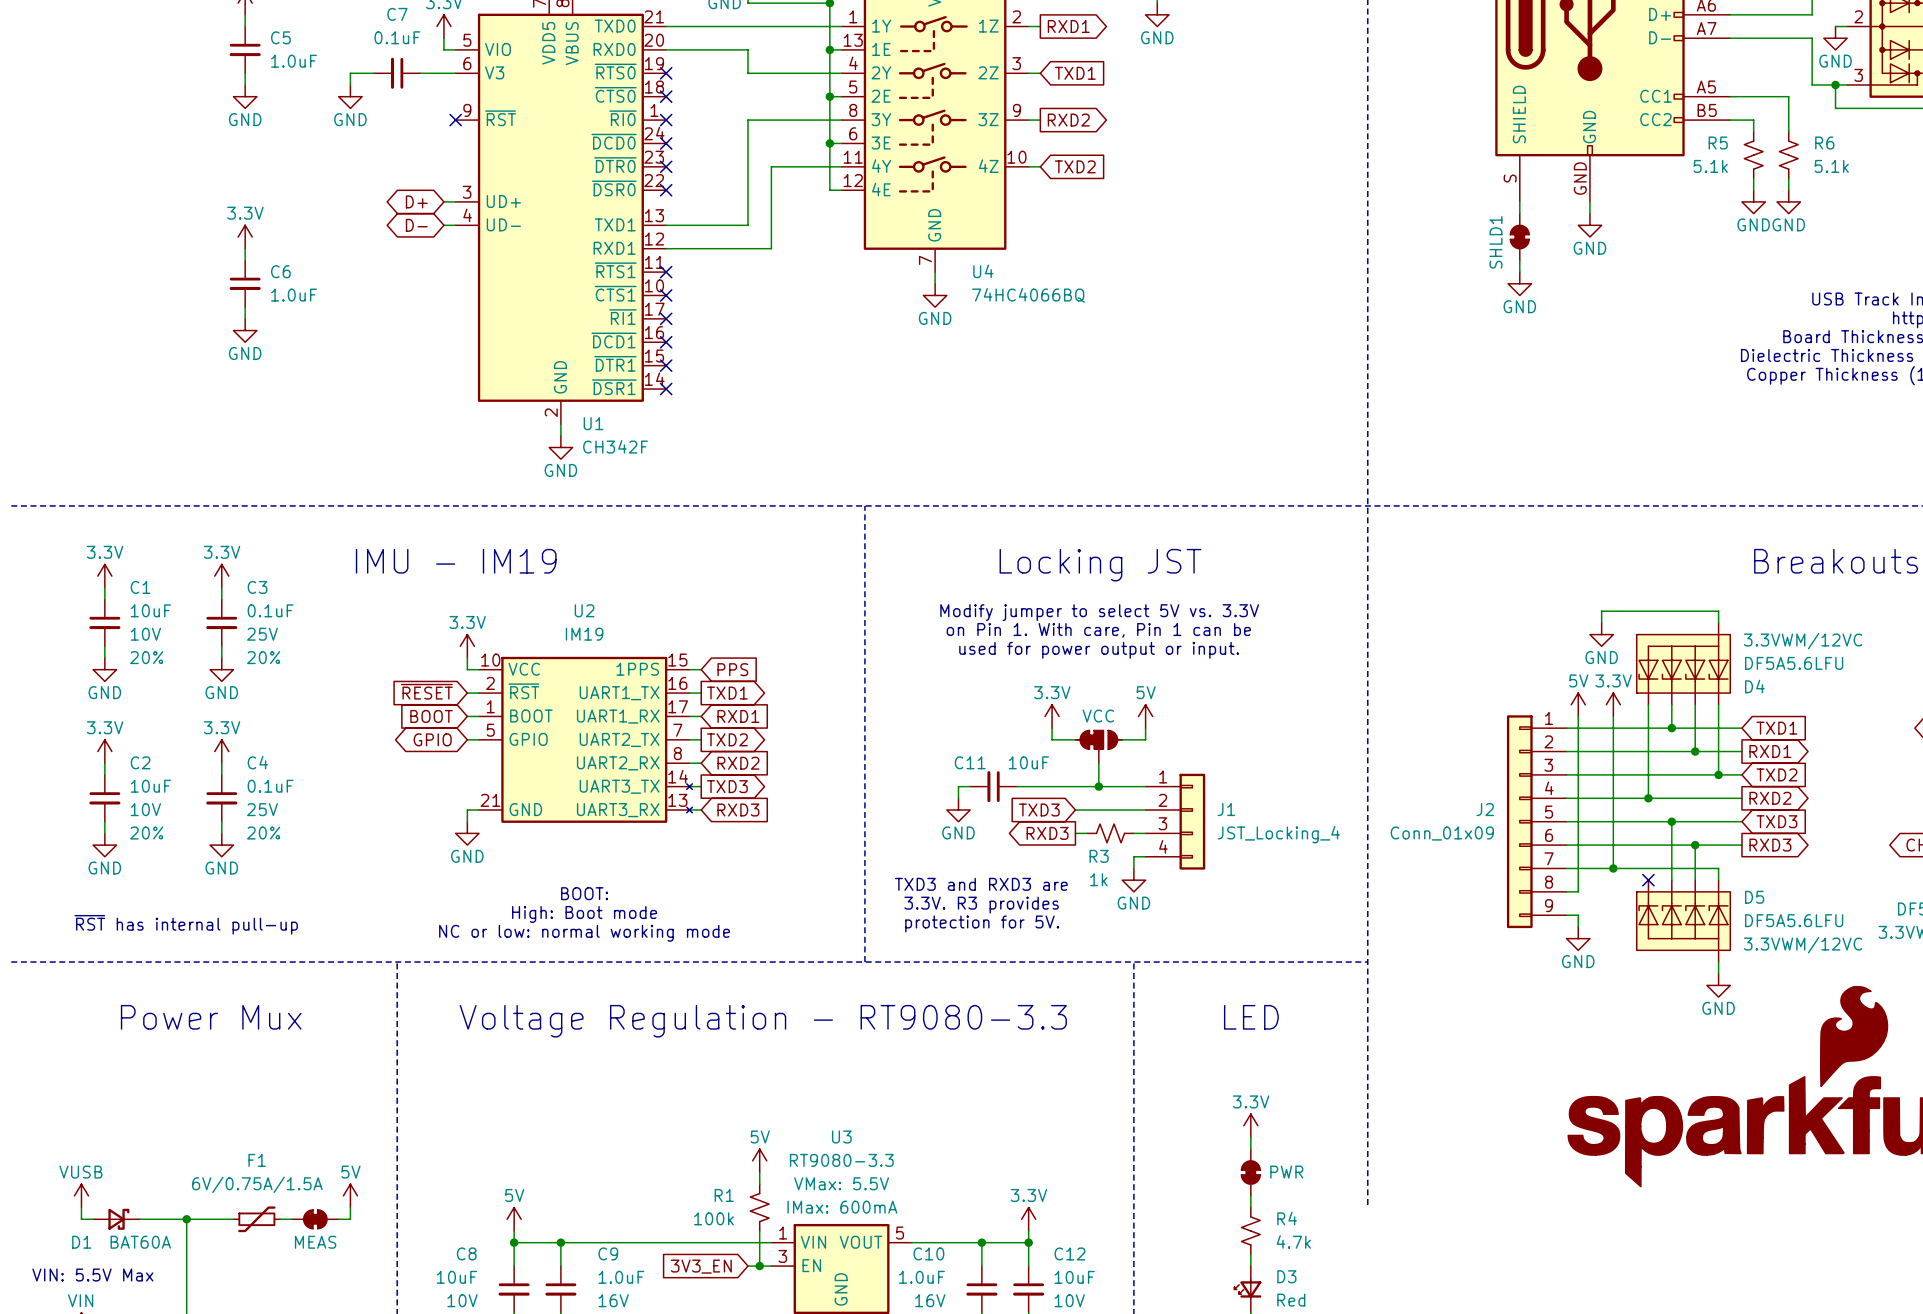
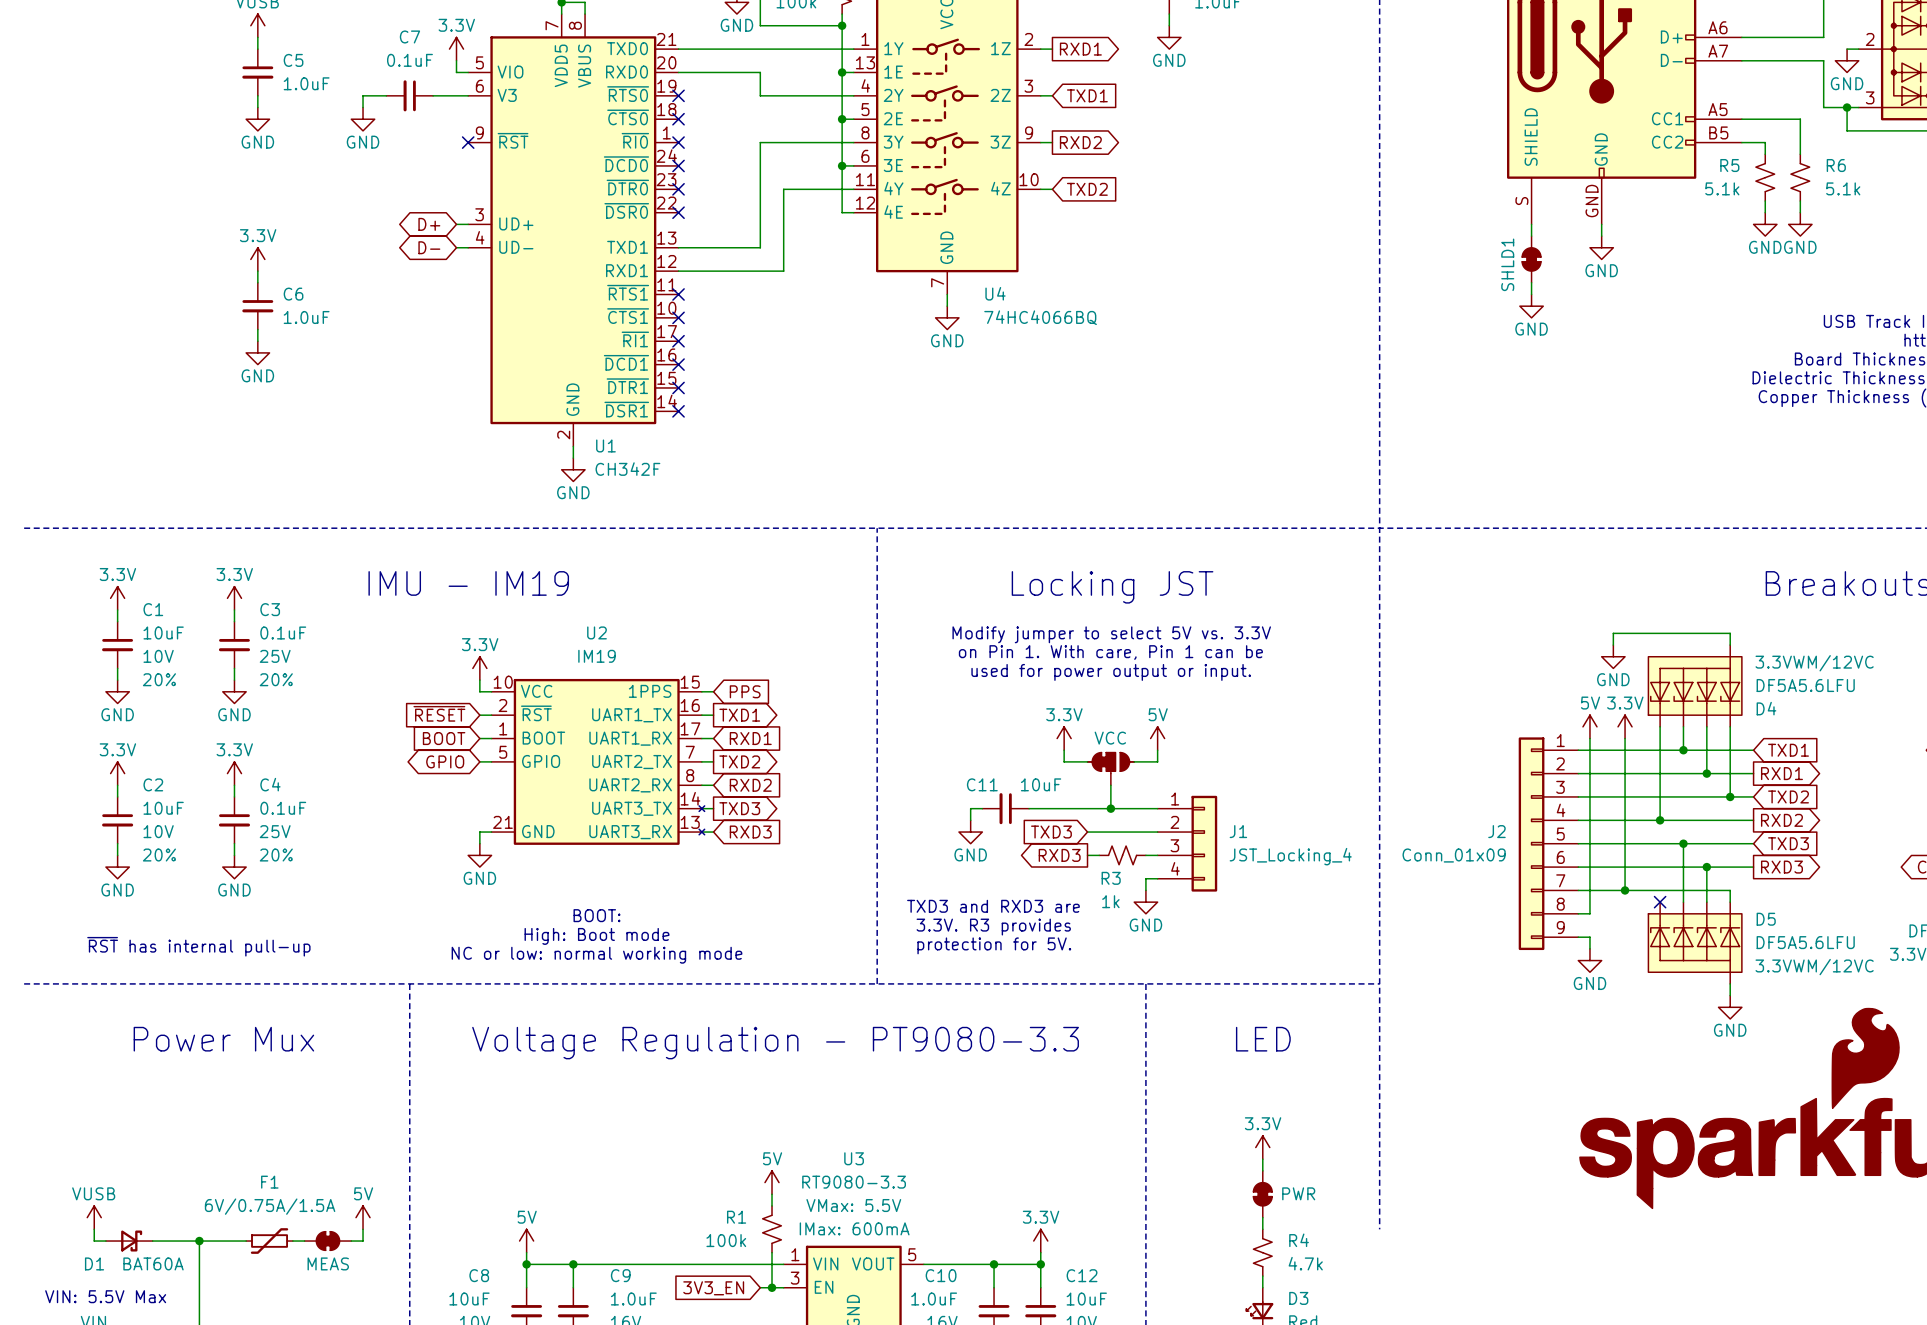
text: Voltage Regulation - RT9080-3.3 (763, 1021) -> Voltage Regulation - PT9080-3.3 (775, 1043)

